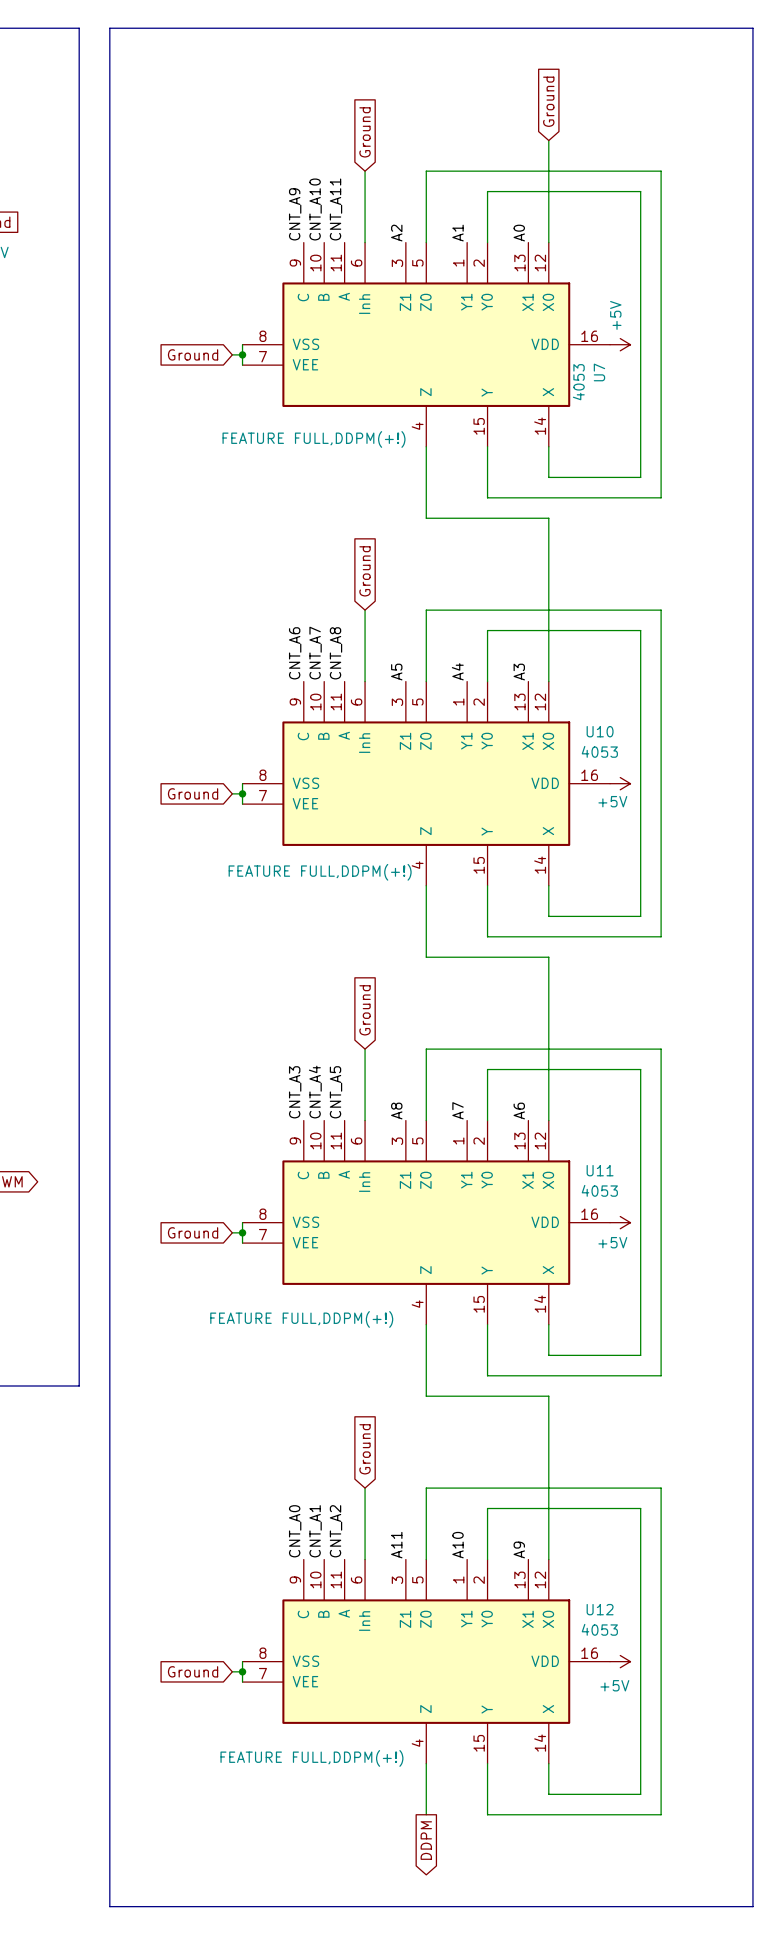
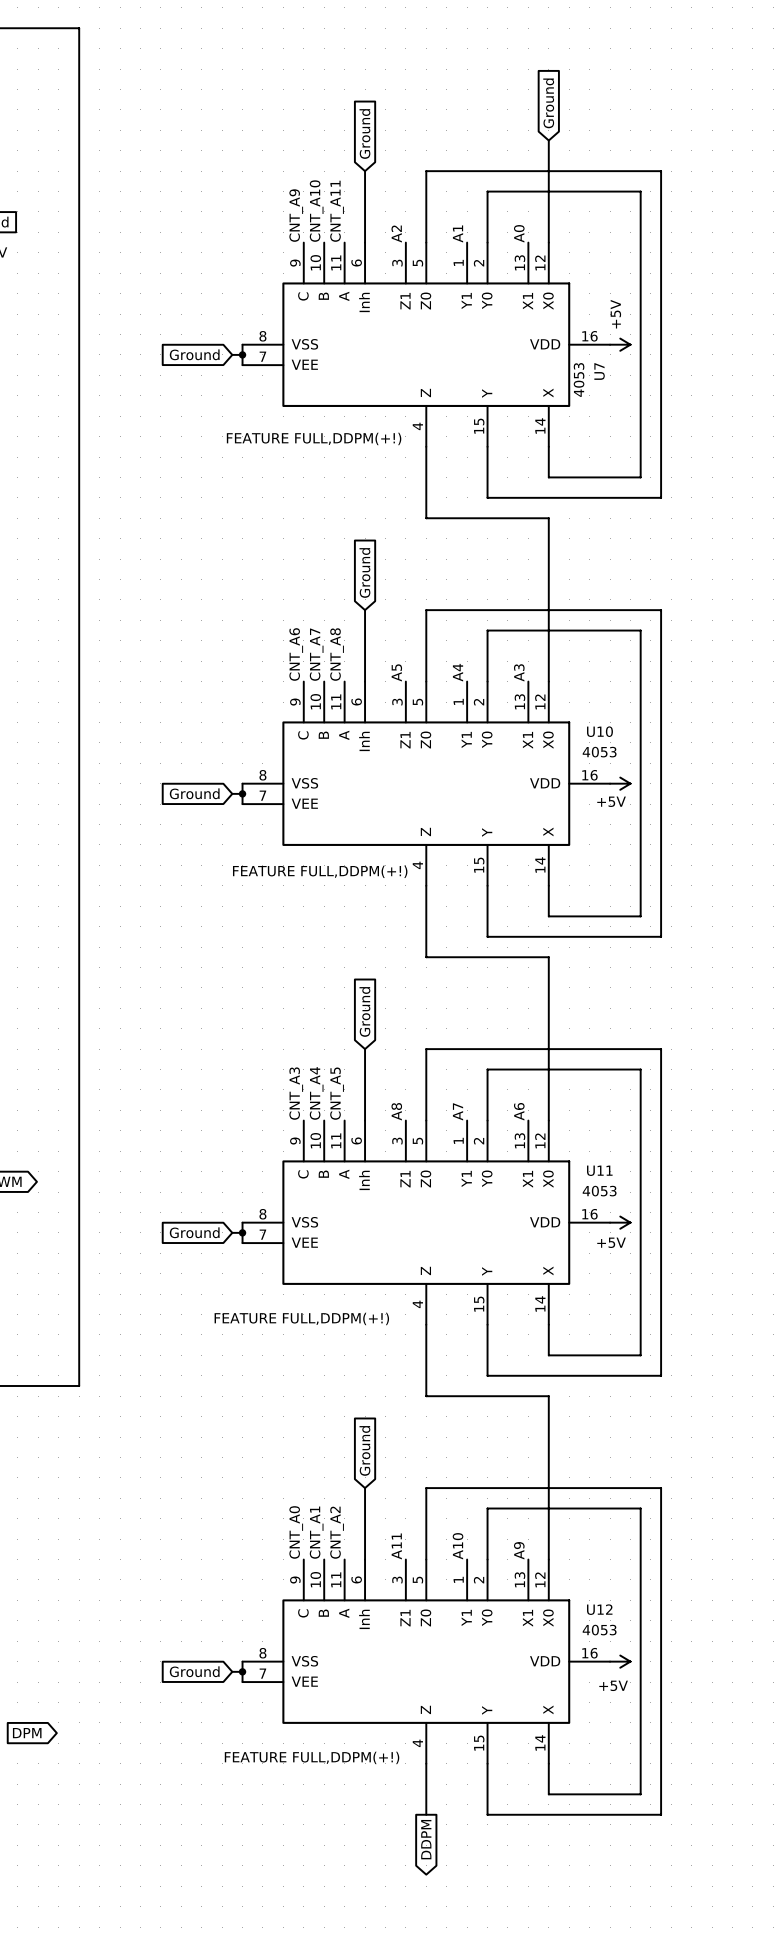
line: (109, 28) (752, 28) (752, 1906) (109, 1906) (109, 28) -> none
global label: none -> DPM (27, 1733)

